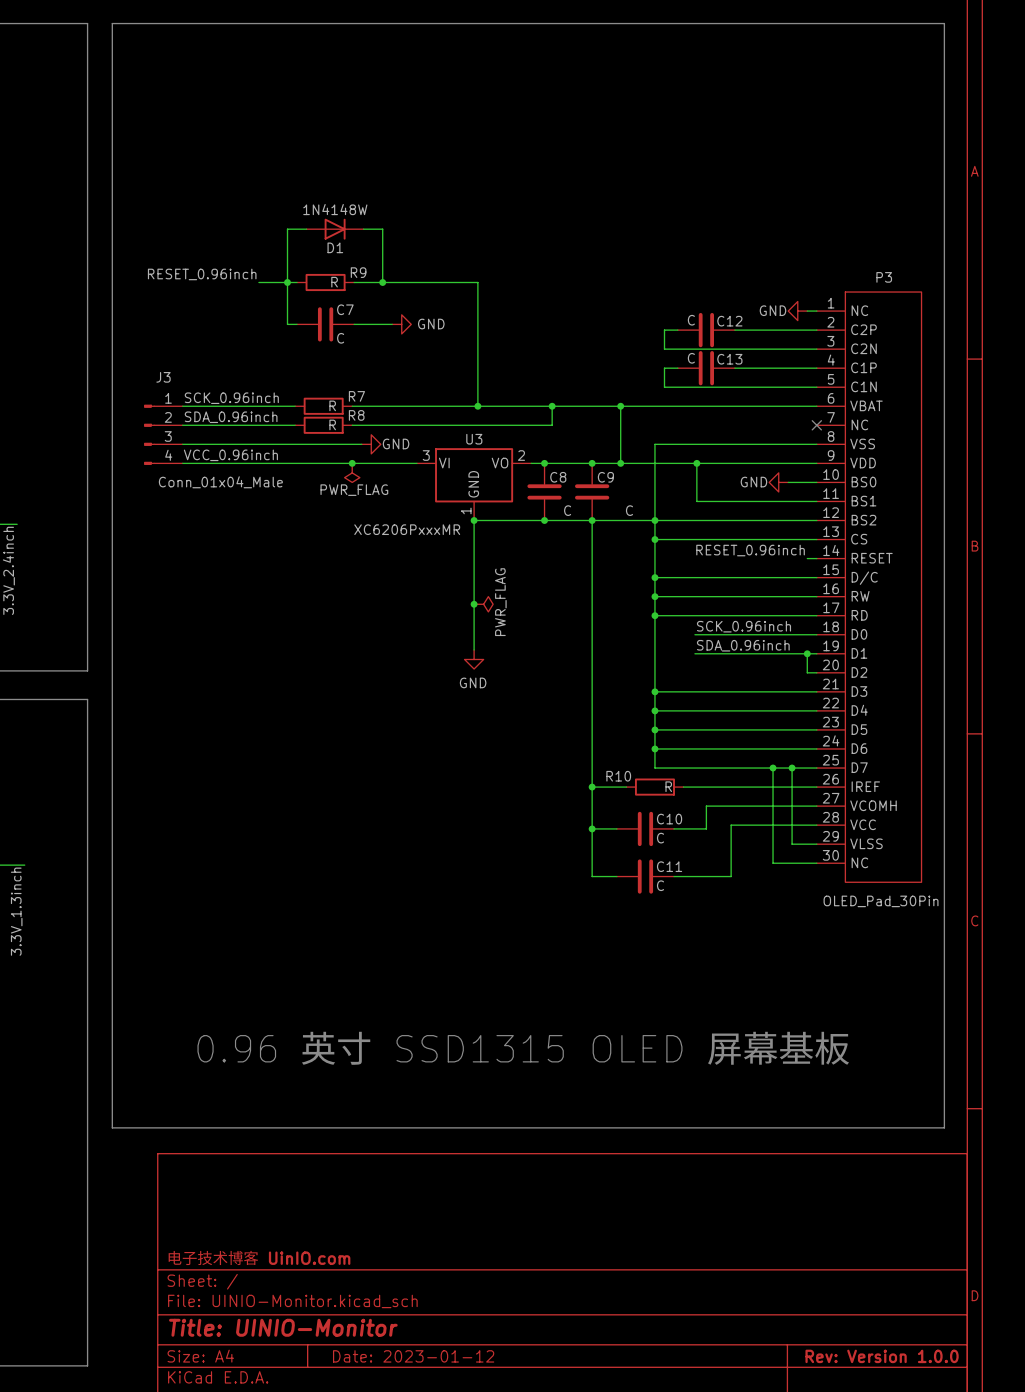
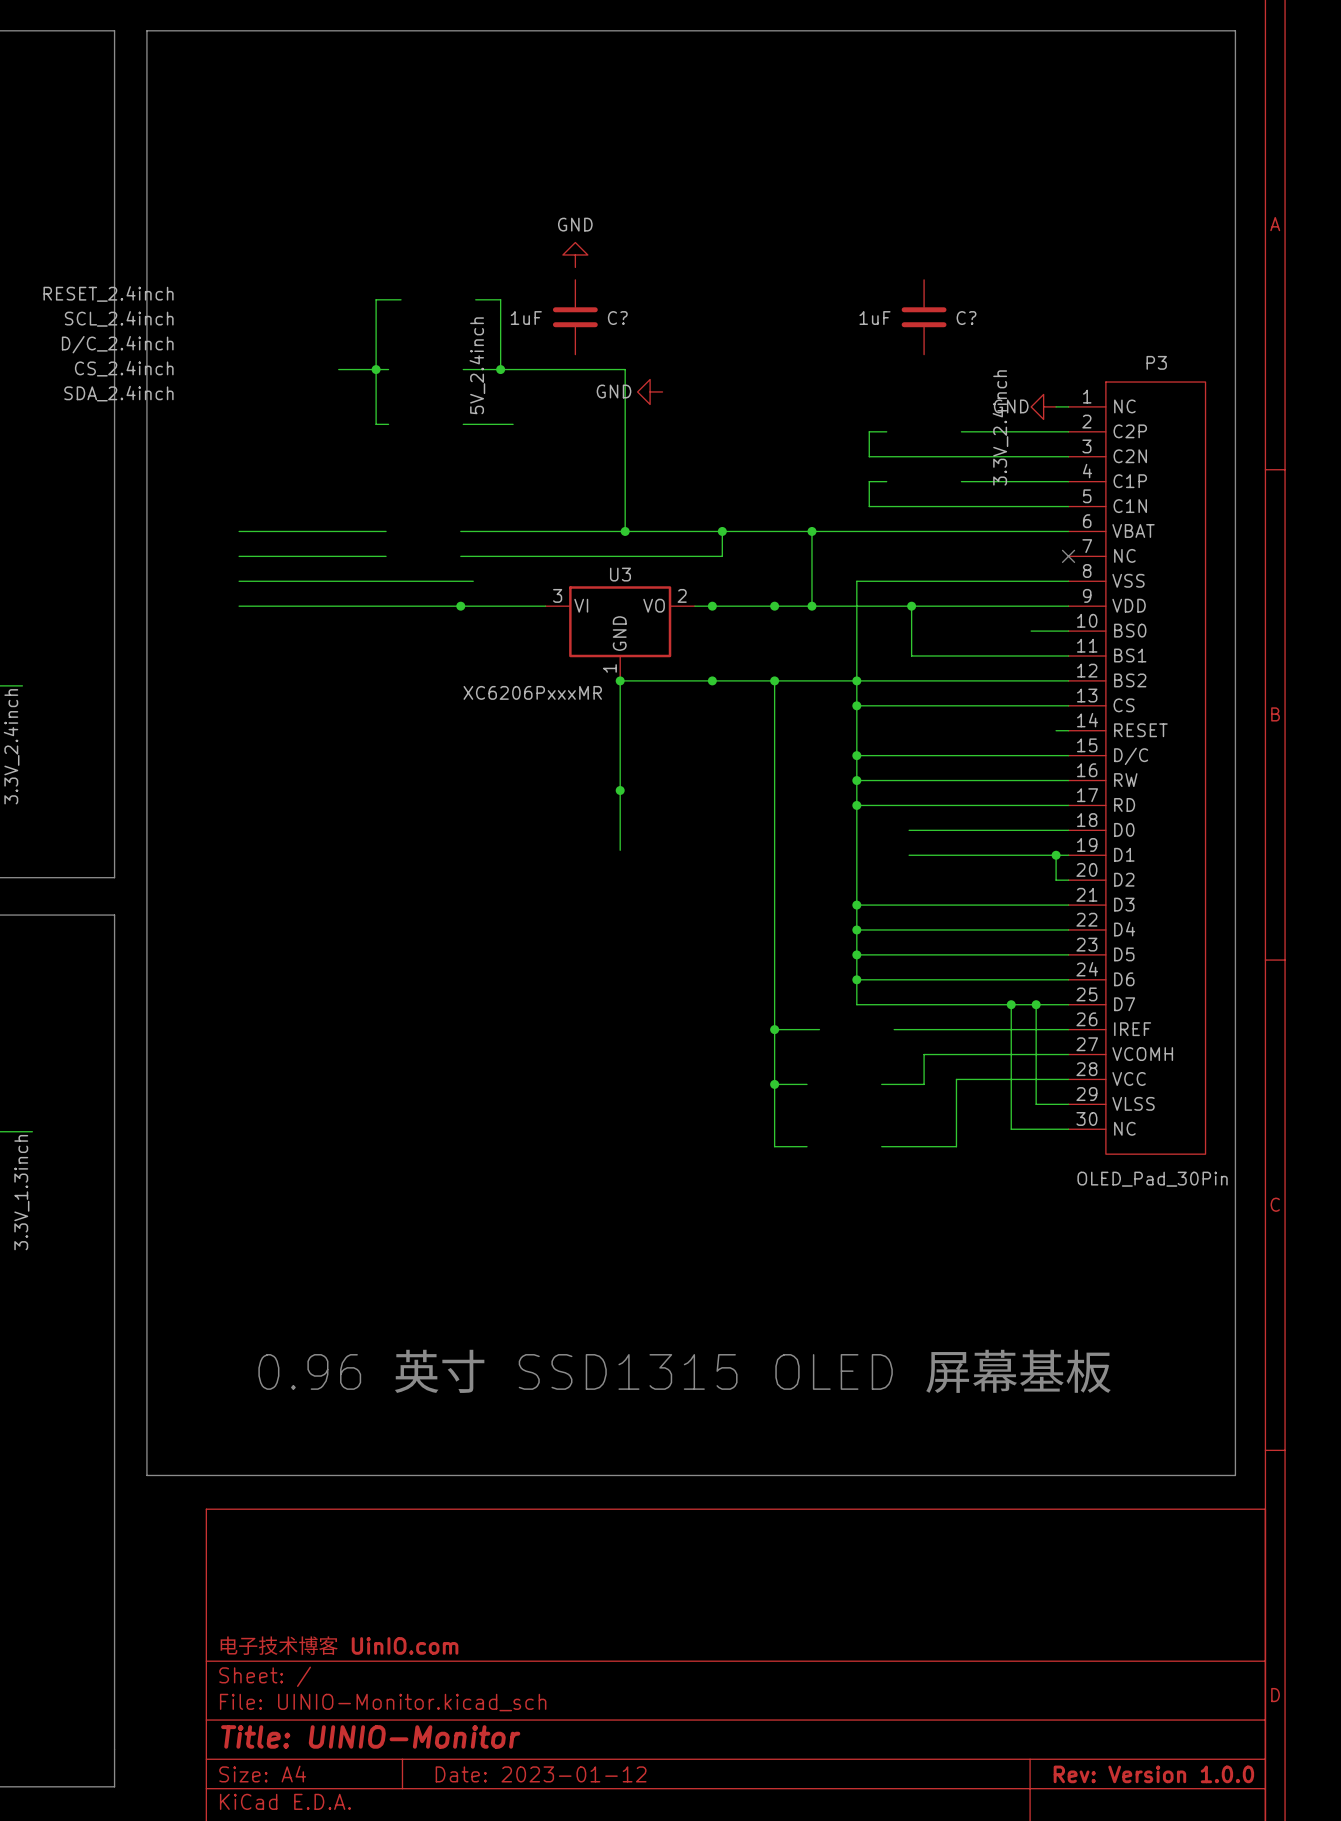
power symbol: none -> GND (575, 254)
label: none -> RESET_2.4inch (108, 293)
D1: 1N4148W (335, 229) -> none
C?: none -> 1uF (575, 317)
C?: none -> 1uF (924, 317)
label: none -> SCL_2.4inch (119, 318)
label: none -> D/C_2.4inch (117, 344)
label: RESET_0.96inch (202, 274) -> none
label: none -> 5V_2.4inch (477, 365)
label: none -> CS_2.4inch (124, 368)
R9: R (325, 282) -> none
power symbol: none -> GND (650, 391)
label: none -> SDA_2.4inch (118, 393)
C7: C (325, 324) -> none
power symbol: GND (401, 324) -> none
label: none -> 3.3V_2.4inch (1000, 427)
C12: C (706, 330) -> none
C13: C (706, 368) -> none
label: SCK_0.96inch (231, 398) -> none
R7: R (323, 406) -> none
label: SDA_0.96inch (231, 417) -> none
R8: R (323, 425) -> none
J3: Conn_01x04_Male (163, 434) -> none
power symbol: GND (371, 444) -> none
label: VCC_0.96inch (230, 455) -> none
power symbol: PWR_FLAG (352, 472) -> none
power symbol: GND (778, 482) -> none
C8: C (544, 491) -> none
C9: C (592, 491) -> none
label: RESET_0.96inch (750, 550) -> none
power symbol: PWR_FLAG (483, 604) -> none
label: SCK_0.96inch (743, 626) -> none
label: SDA_0.96inch (743, 645) -> none
power symbol: GND (474, 659) -> none
R10: R (654, 787) -> none
C10: C (645, 828) -> none
C11: C (645, 876) -> none

